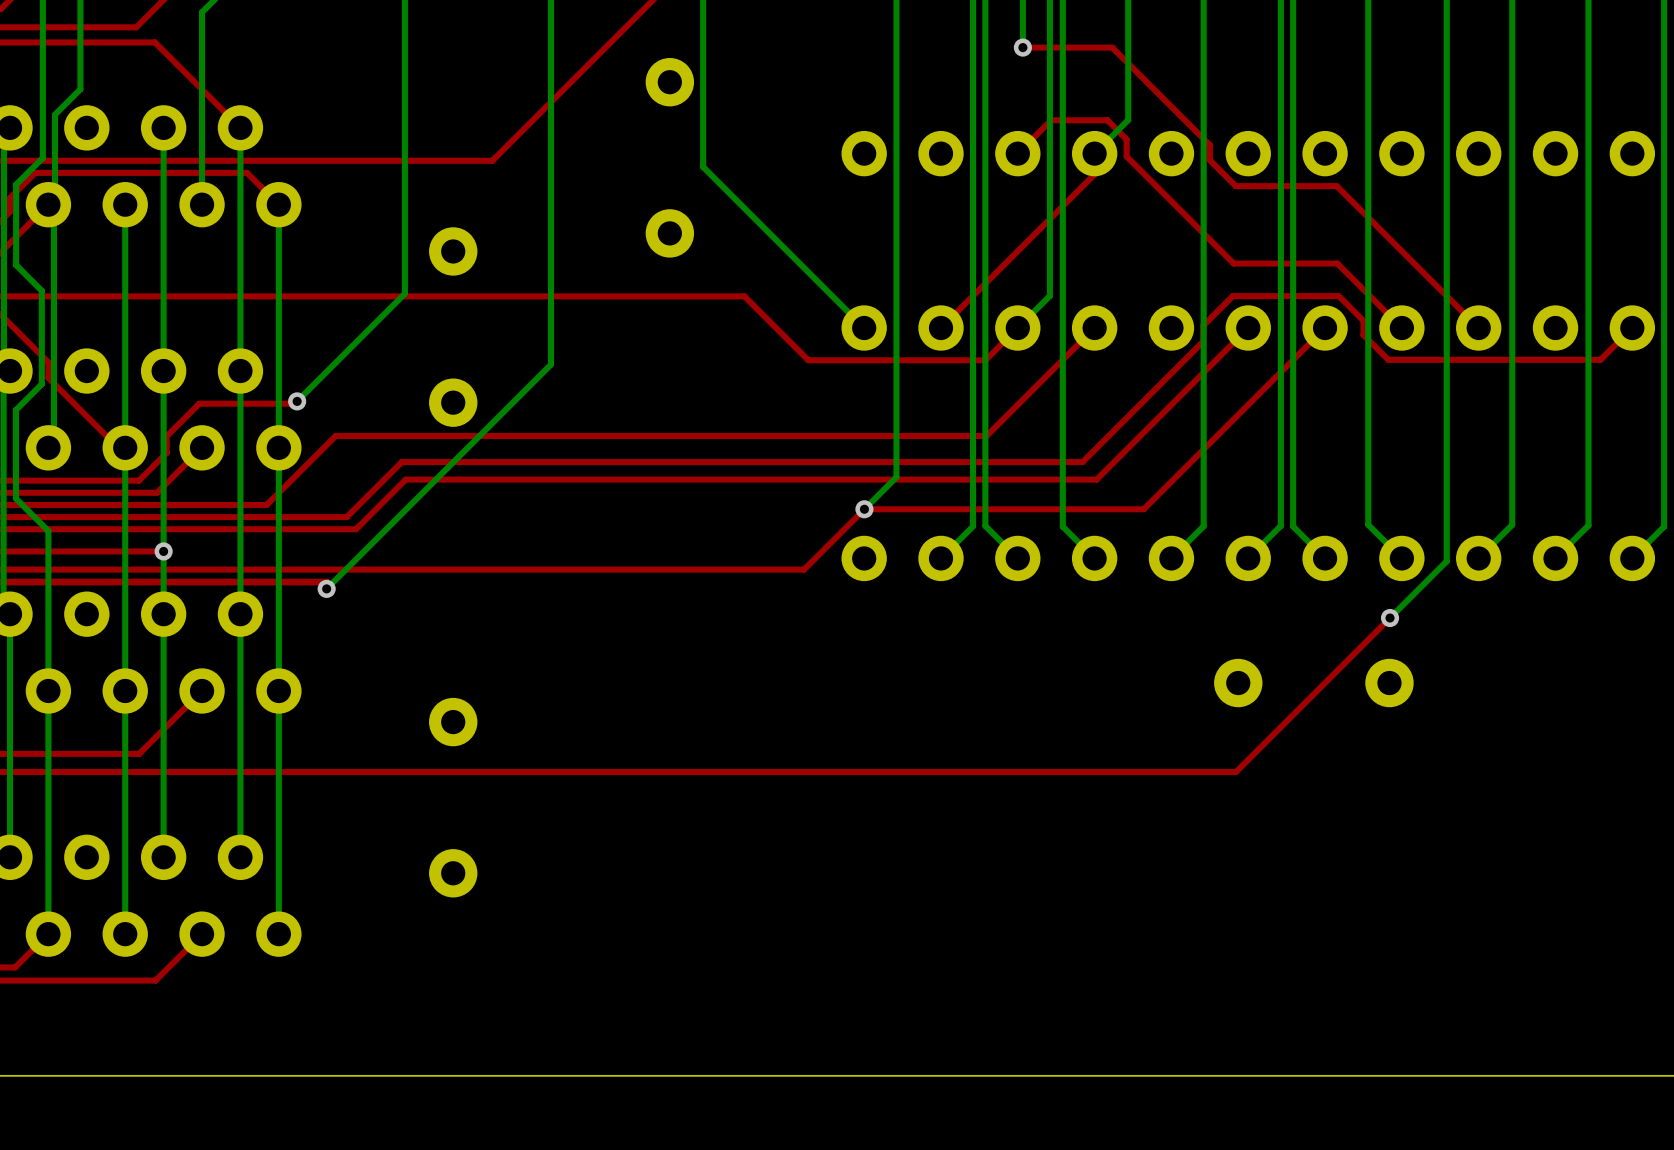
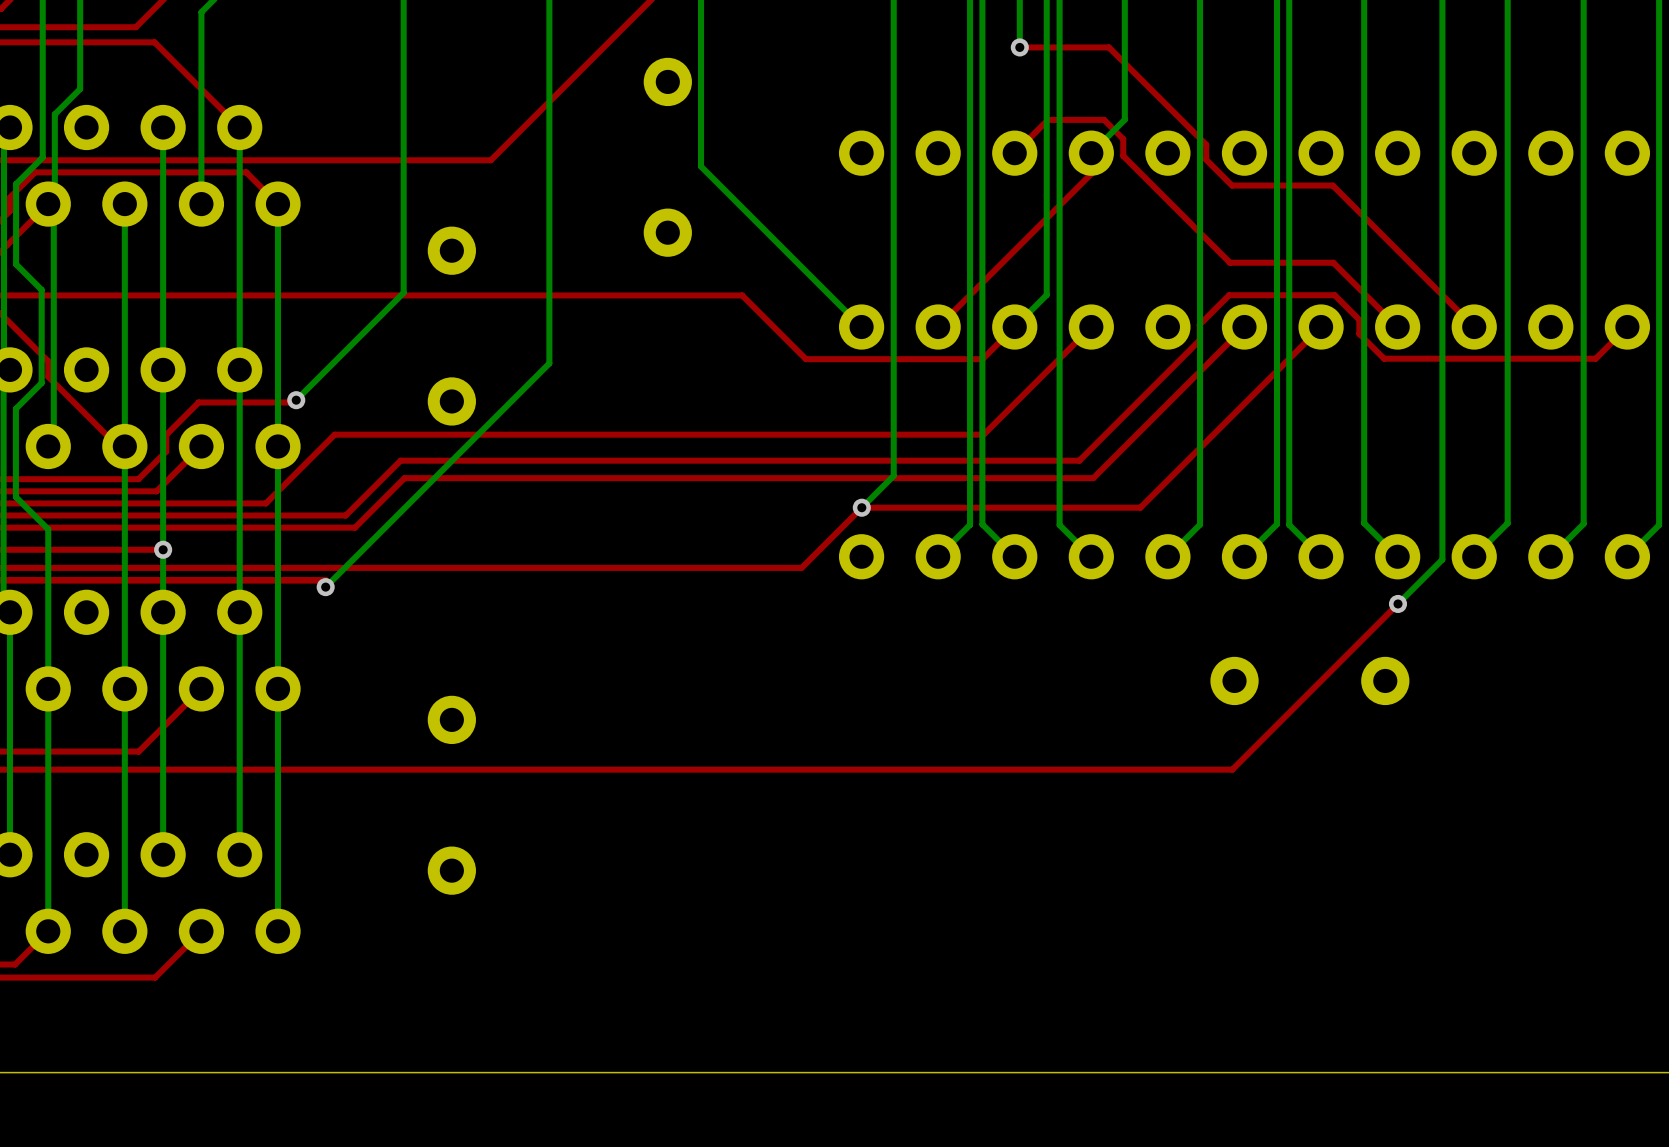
top track: (1390, 618) (1236, 772) -> (1398, 603) (1232, 769)
via position: (1390, 618) -> (1398, 603)

